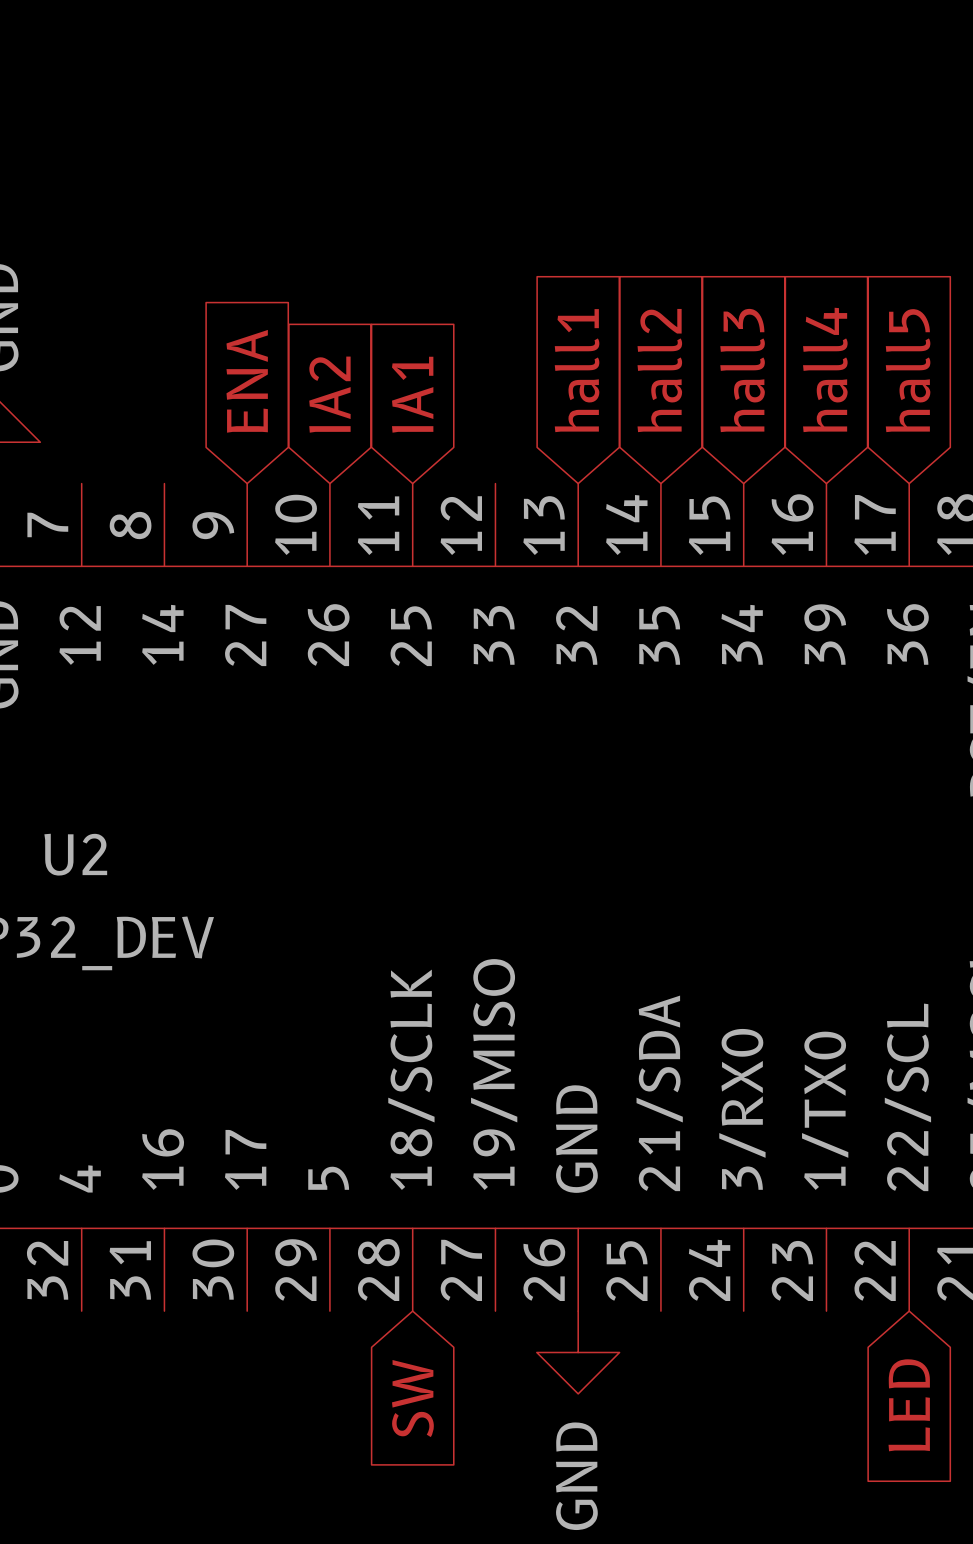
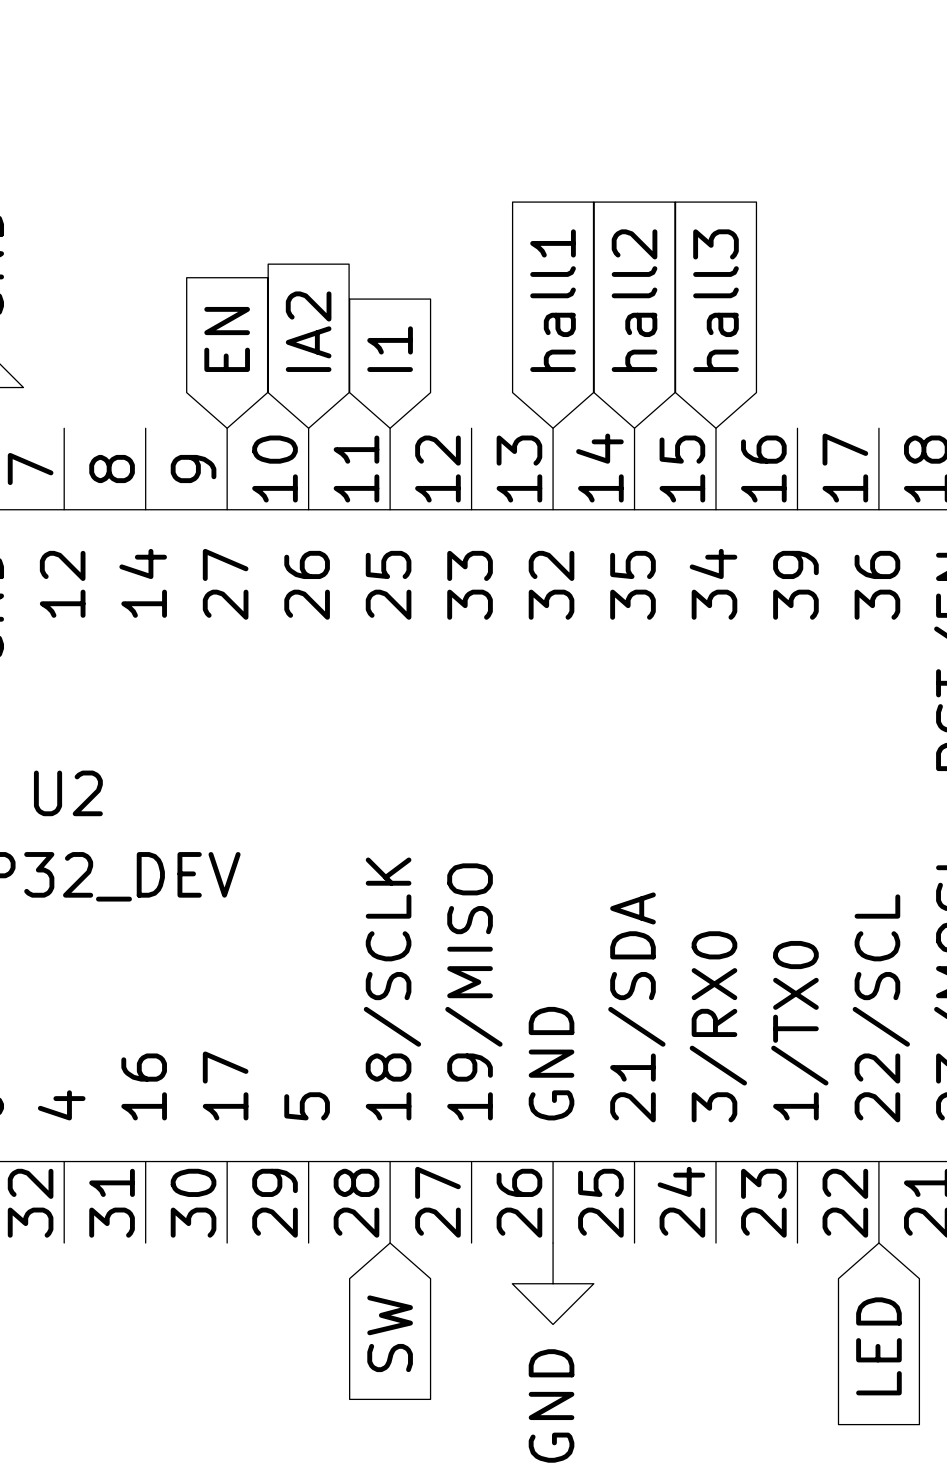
global label: hall4 (825, 369) -> none
global label: hall5 (908, 370) -> none
global label: ENA (247, 381) -> EN (227, 339)
global label: IA1 (412, 394) -> I1 (390, 349)

